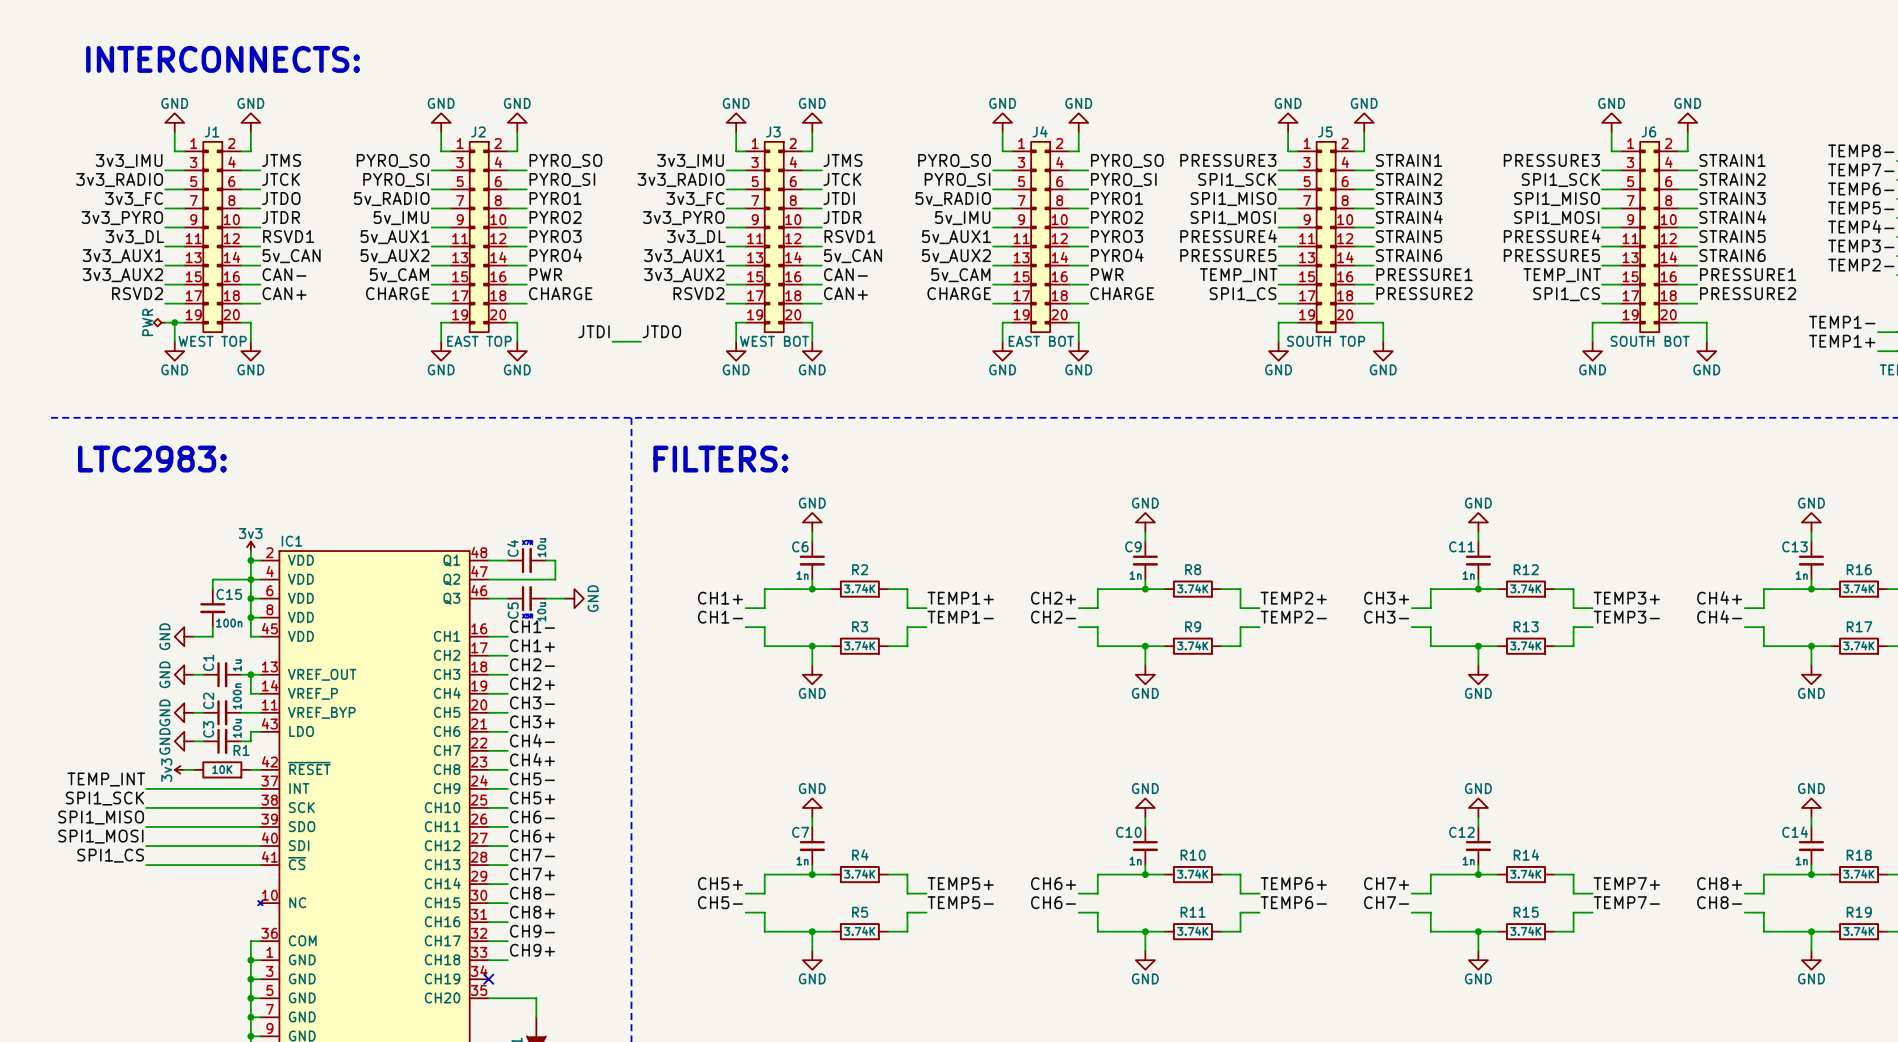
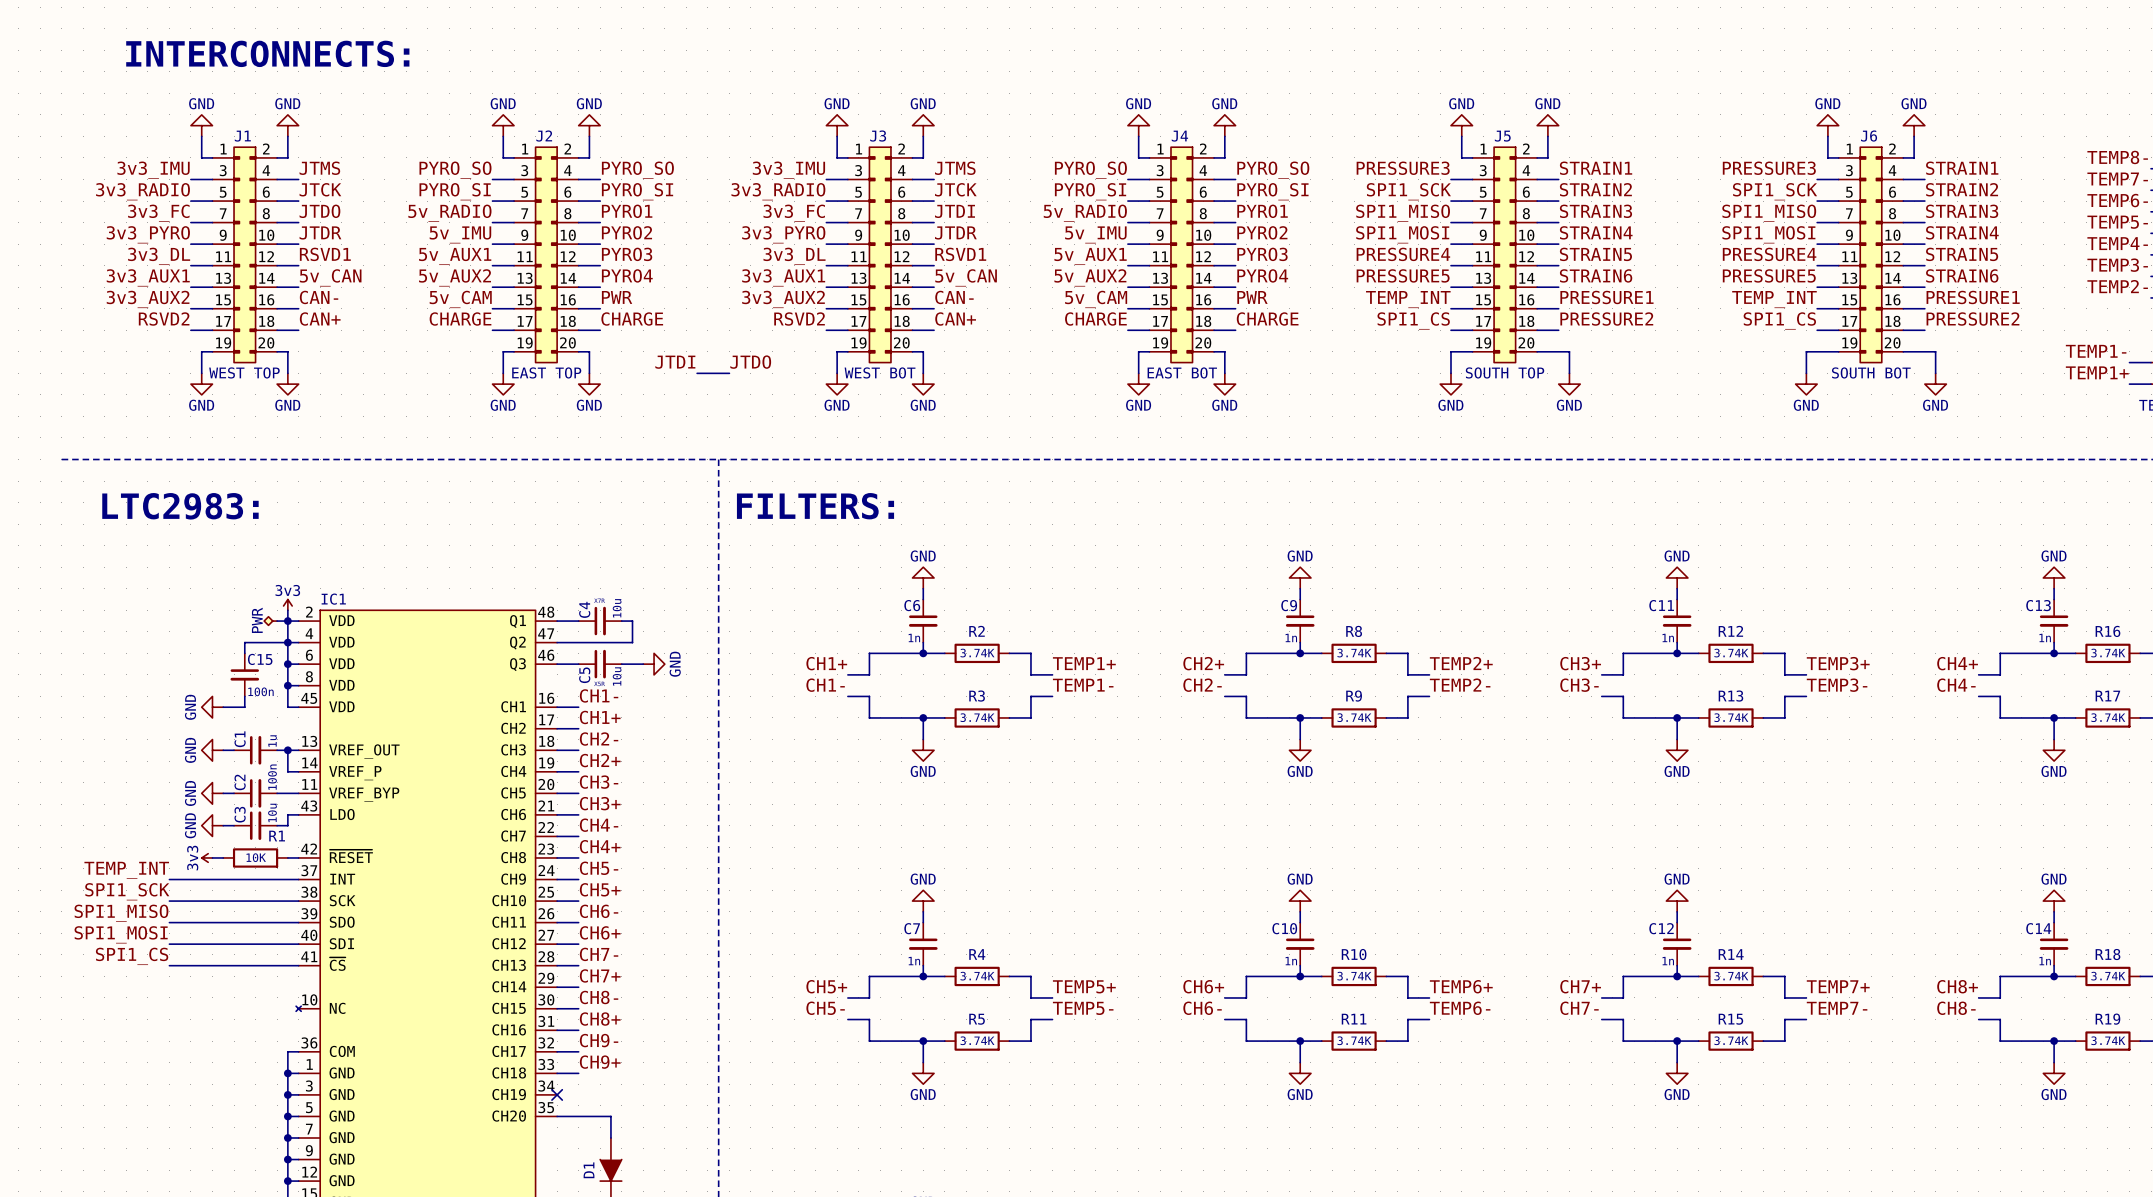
power symbol: PWR (159, 322) -> none
wire: (165, 322) (174, 322) -> none
junction: (174, 322) -> none
power symbol: none -> PWR (270, 621)
wire: none -> (277, 621) (287, 621)

